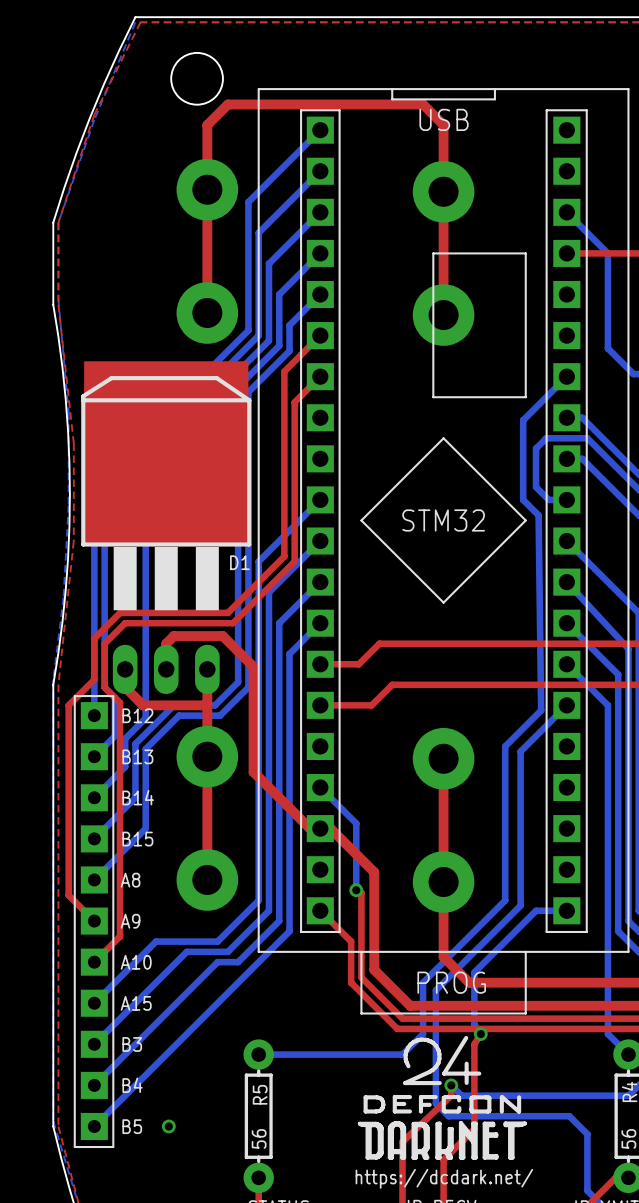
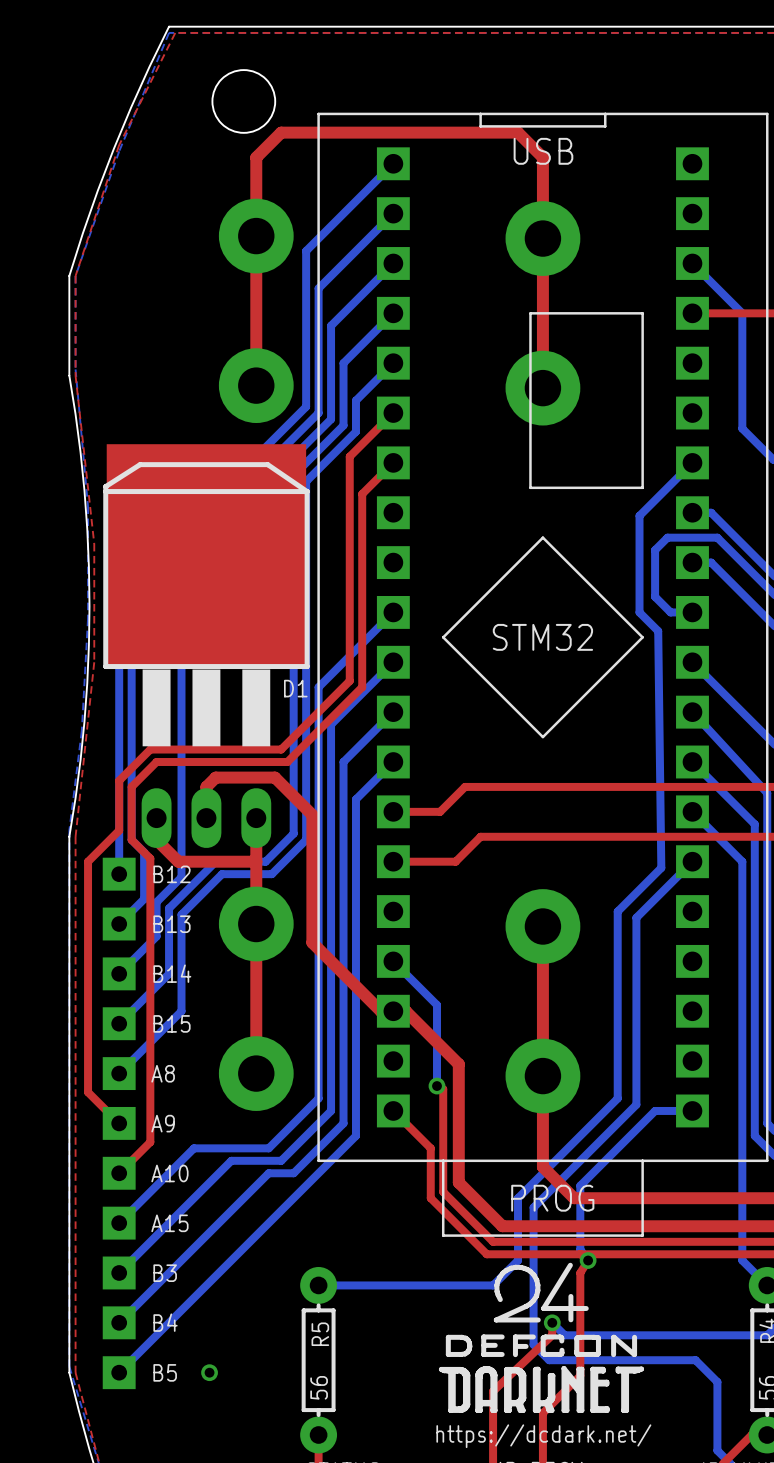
line: (301, 110) (301, 931) (339, 931) (339, 110) (301, 110) -> none
line: (546, 110) (586, 110) (586, 931) (546, 931) (546, 110) -> none
line: (74, 696) (74, 1147) (113, 1147) (113, 696) (74, 696) -> none

